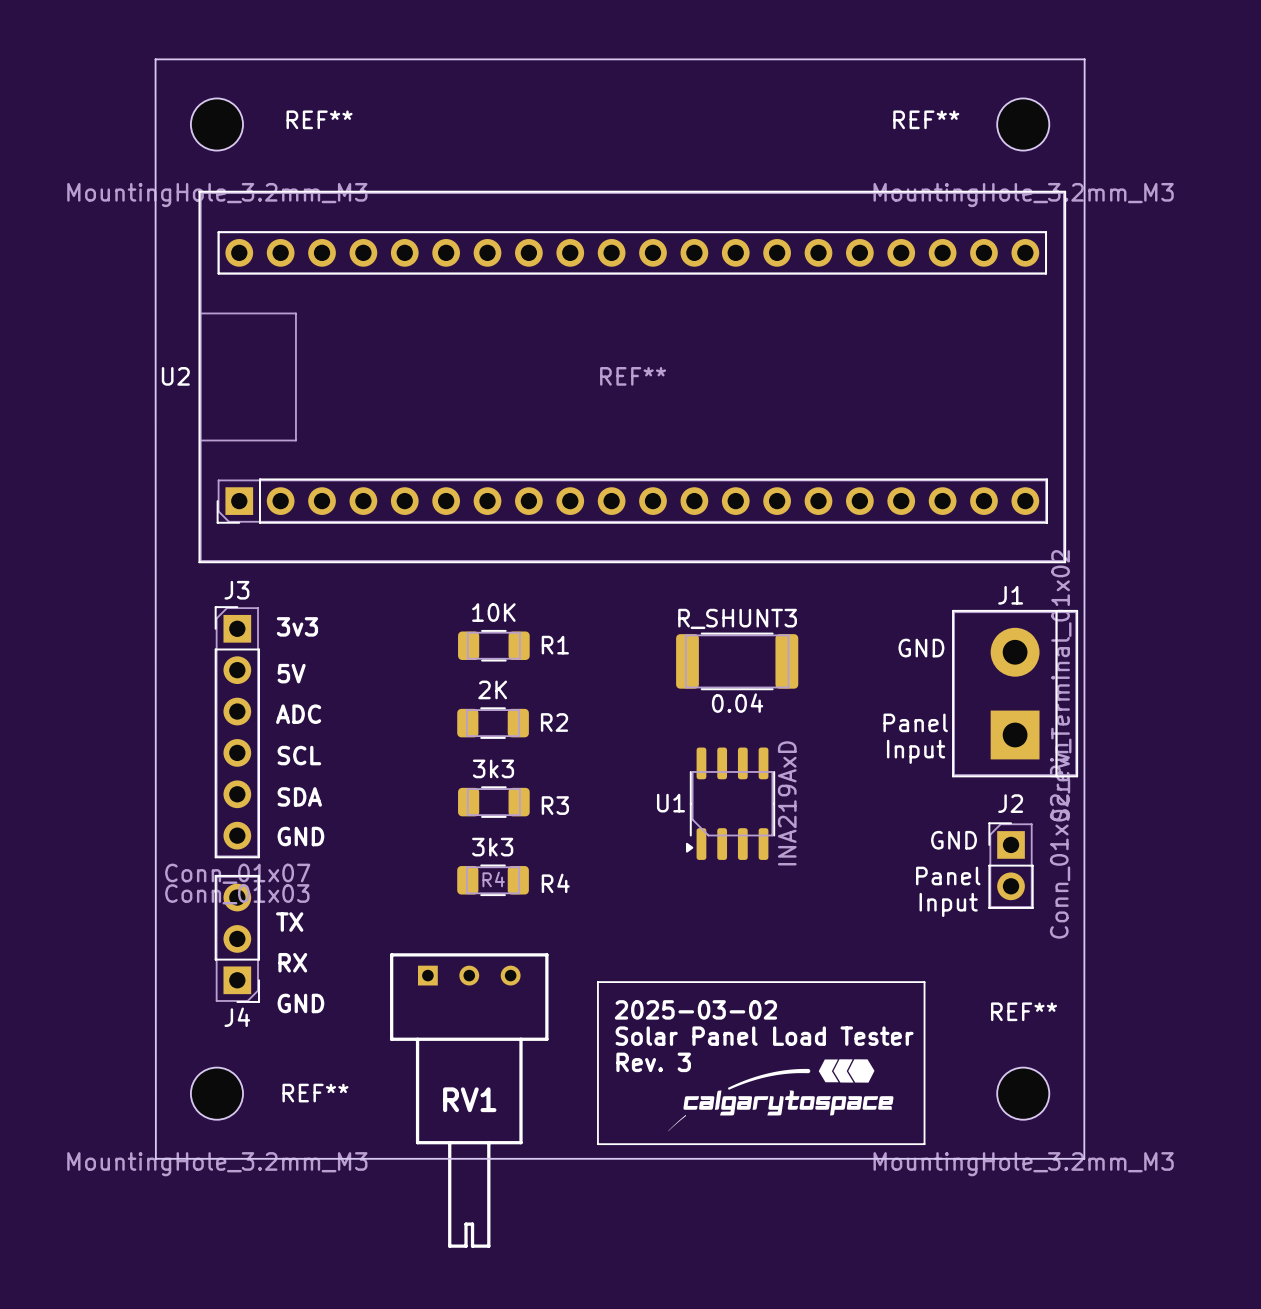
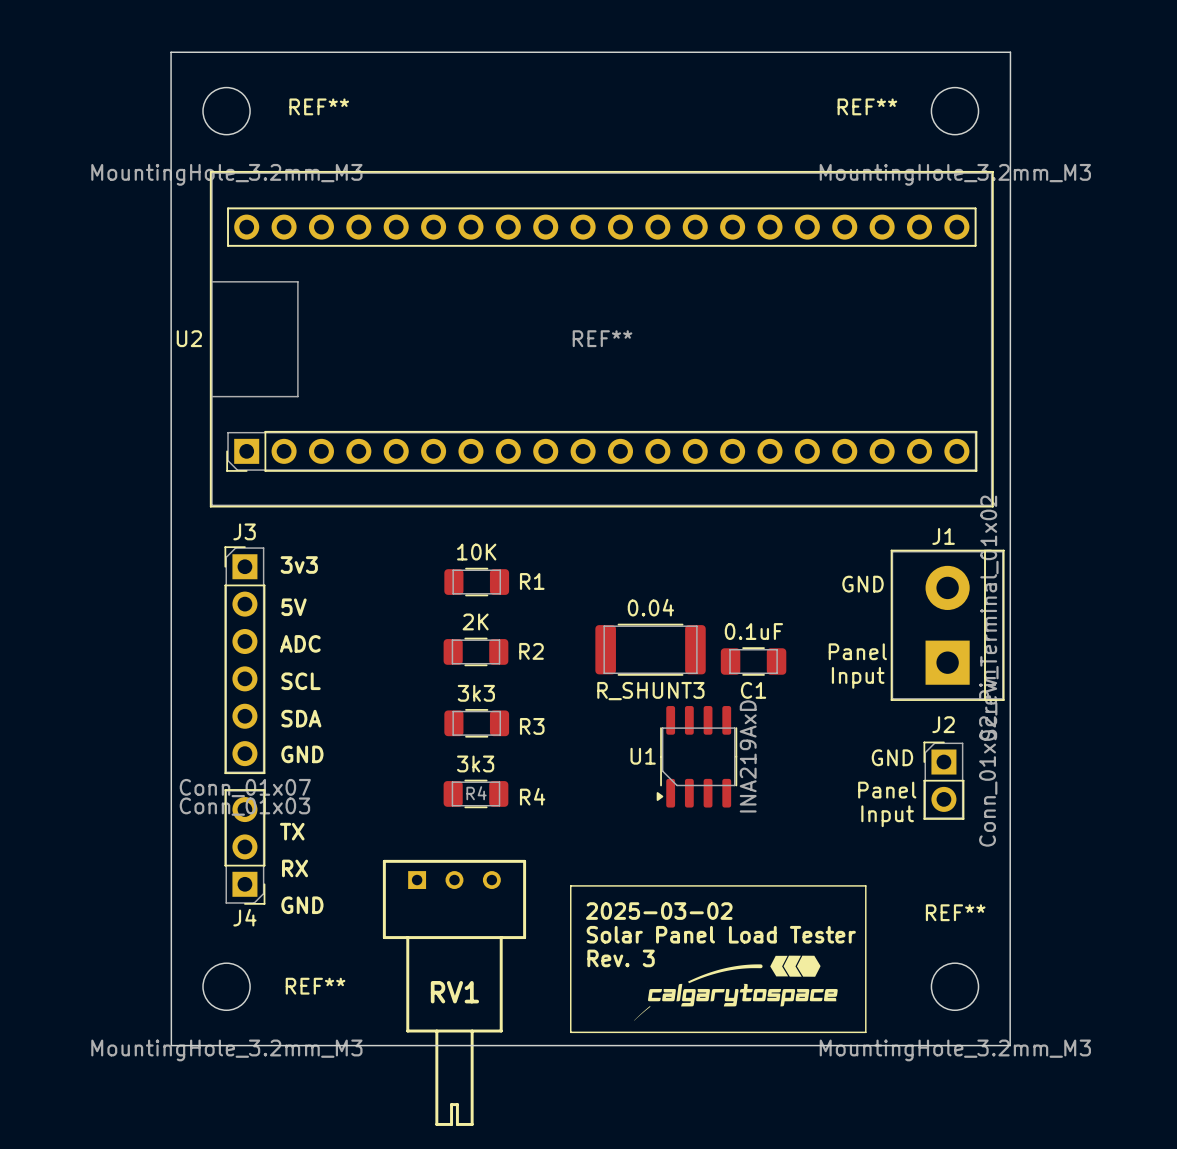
R_SHUNT3 name position: R_SHUNT3 (737, 618) -> R_SHUNT3 (650, 691)
R_SHUNT3 position: (737, 661) -> (650, 649)
R_SHUNT3 value position: 0.04 (737, 703) -> 0.04 (650, 607)
C1: none -> 0.1uF (753, 661)
U1 position: (730, 803) -> (696, 756)

